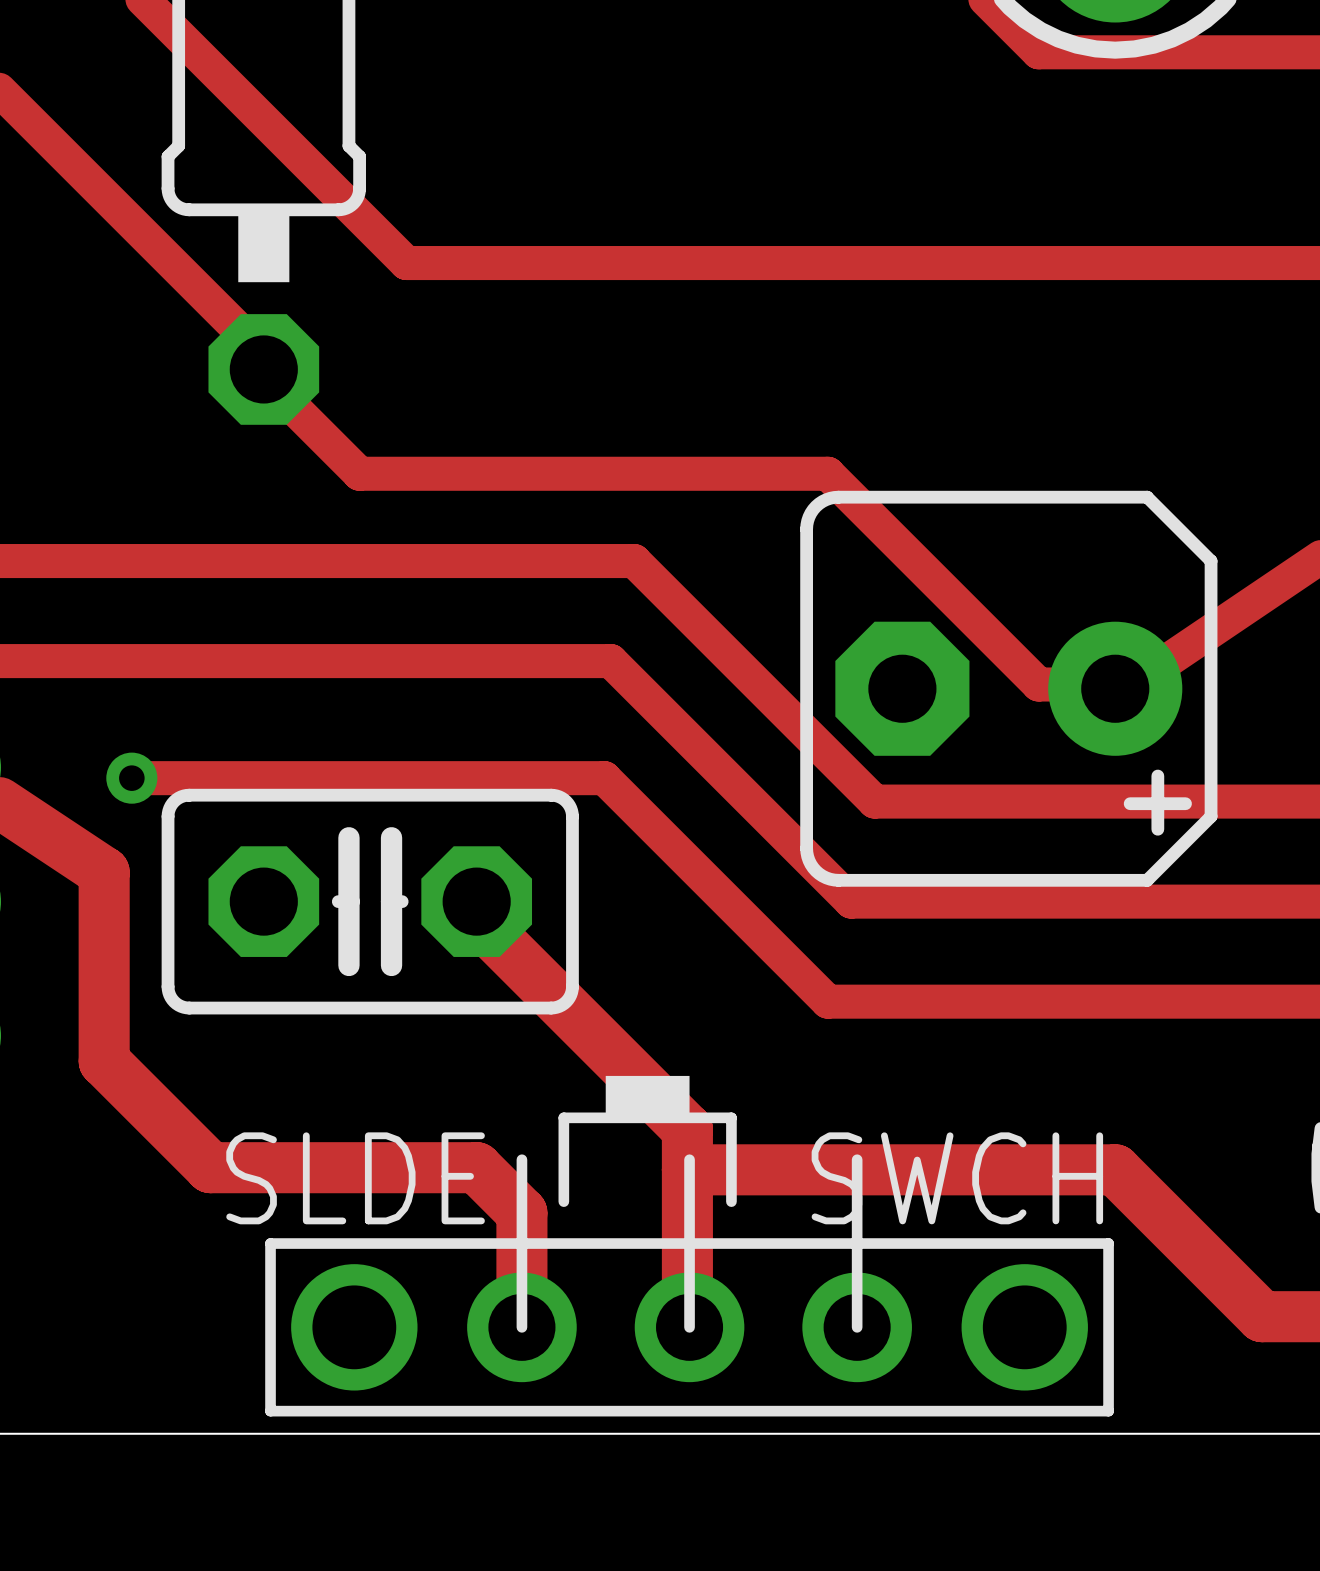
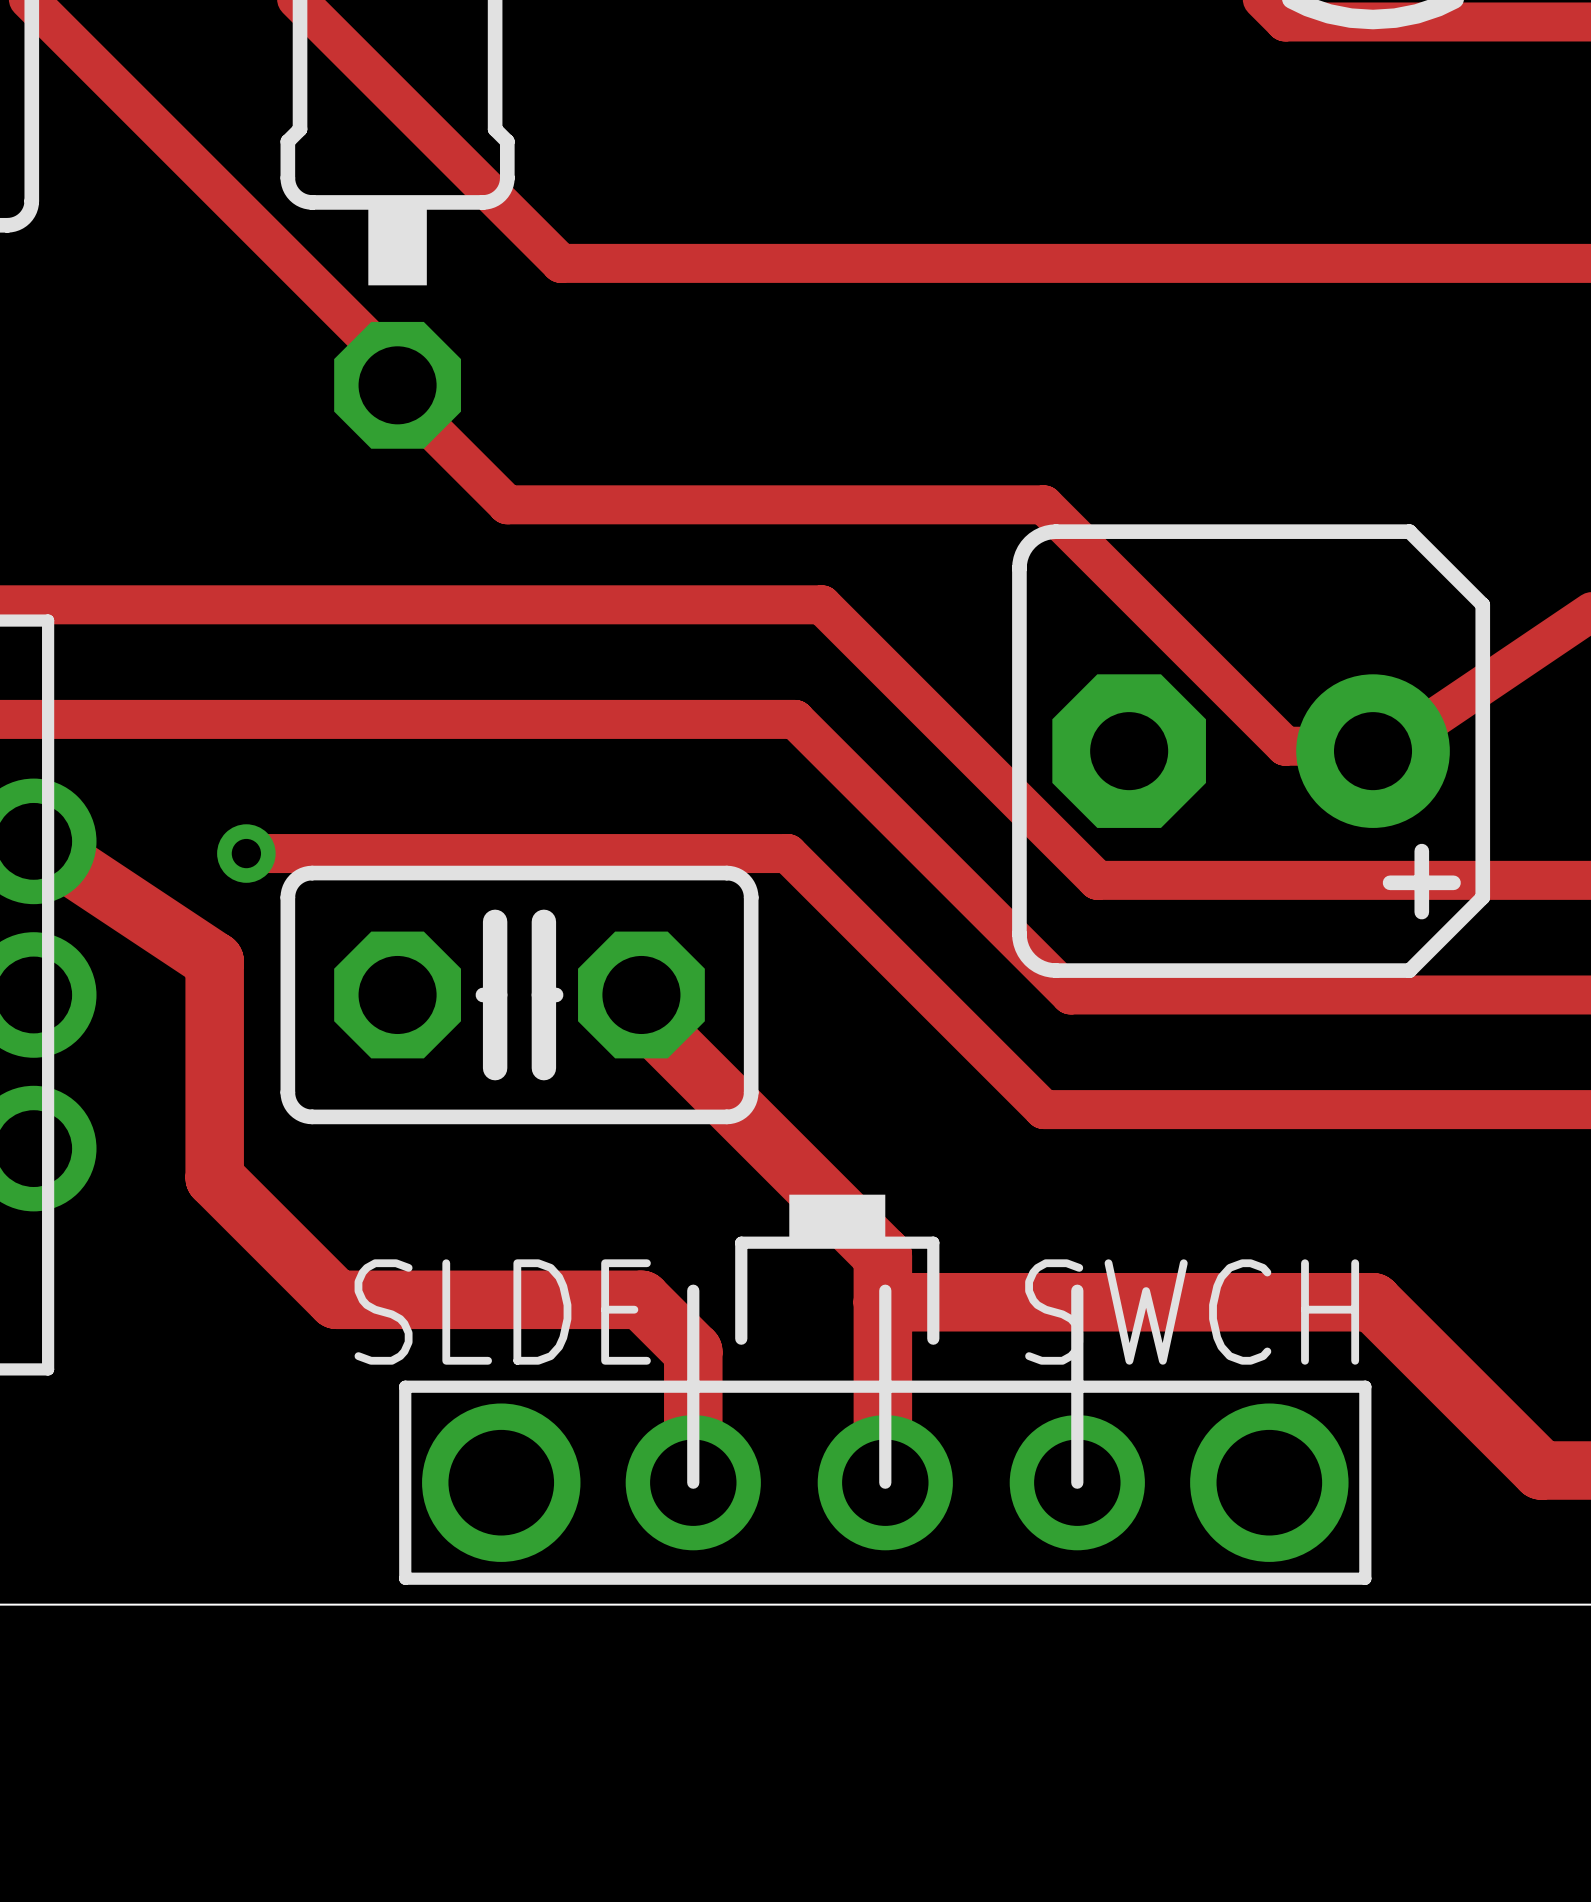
part footprint: [265, 1075, 1114, 1417] -> [399, 1194, 1372, 1585]

